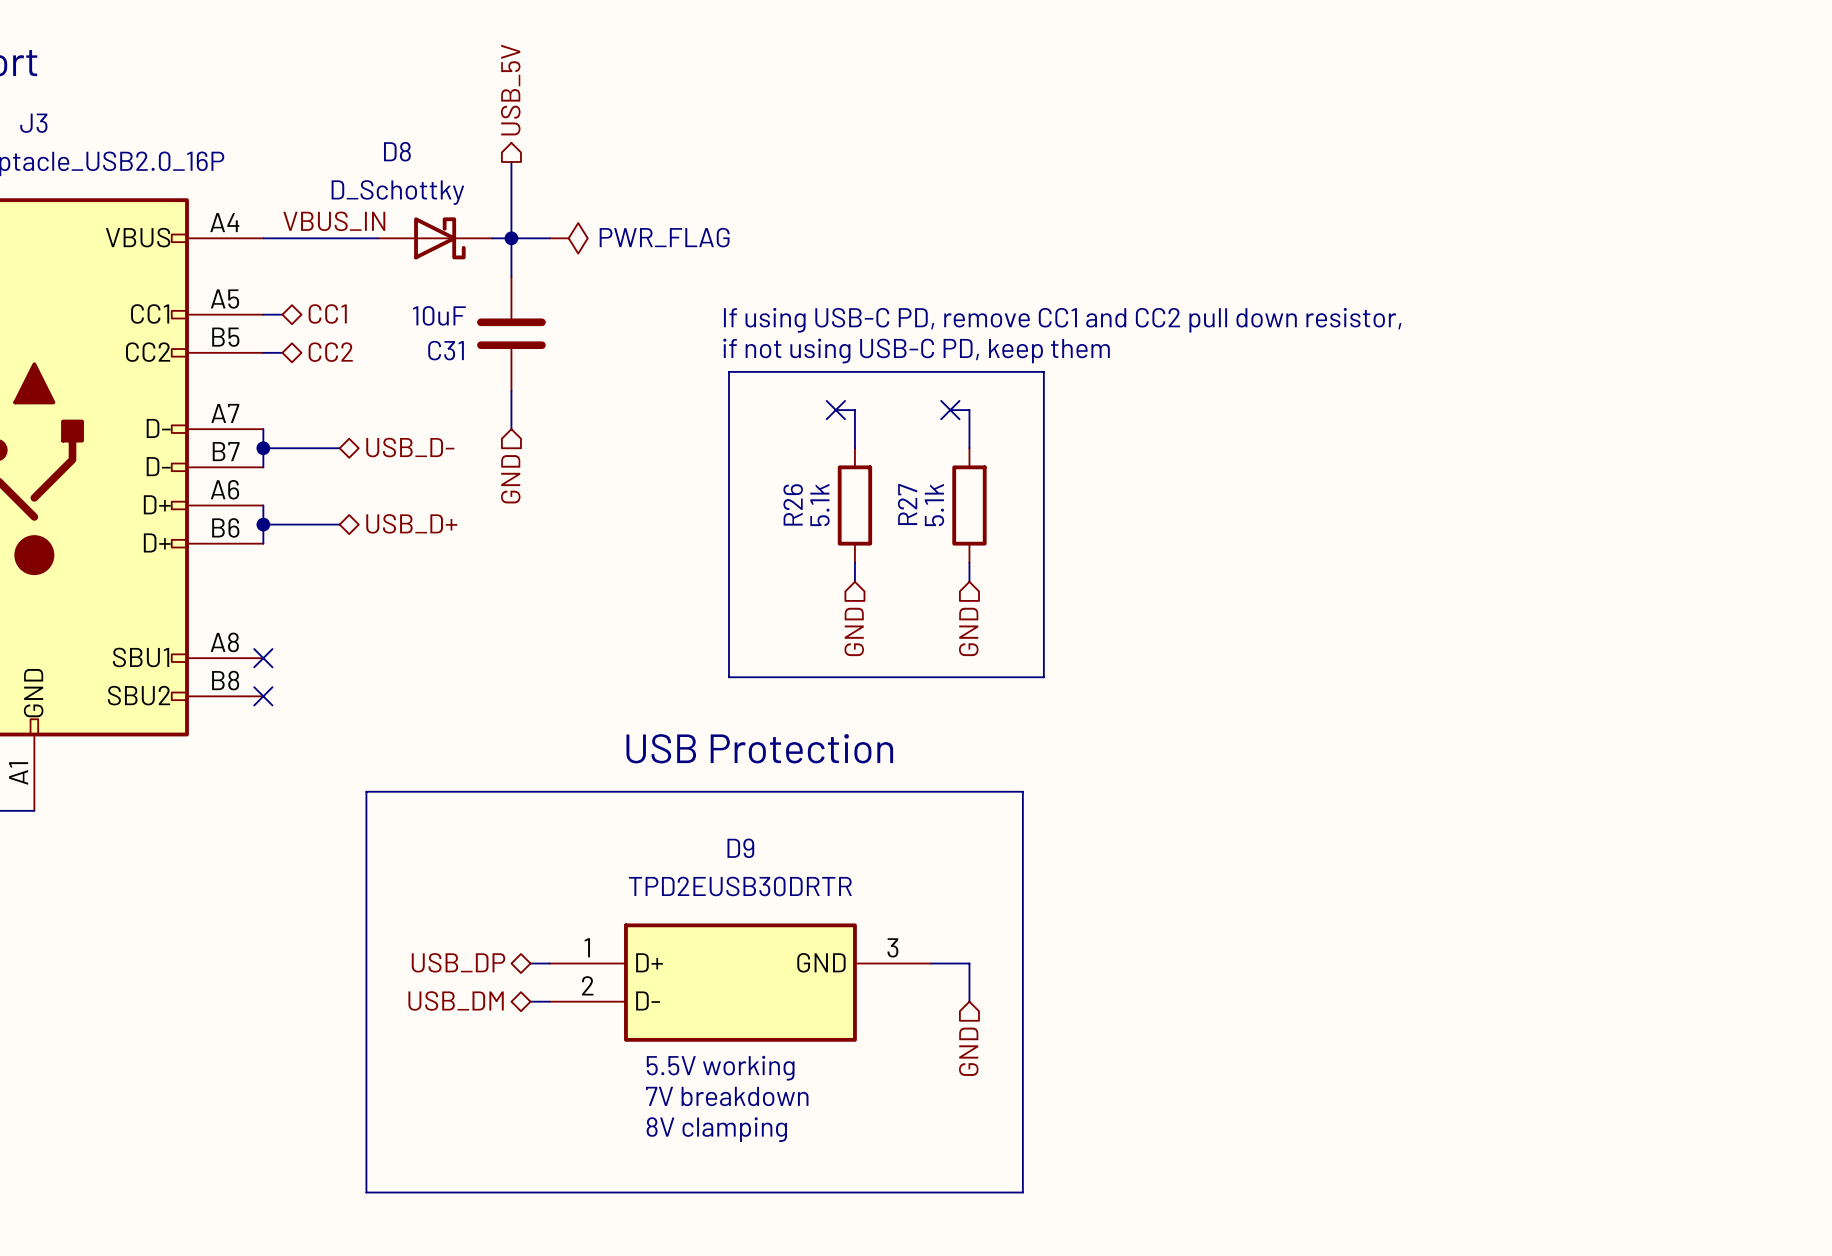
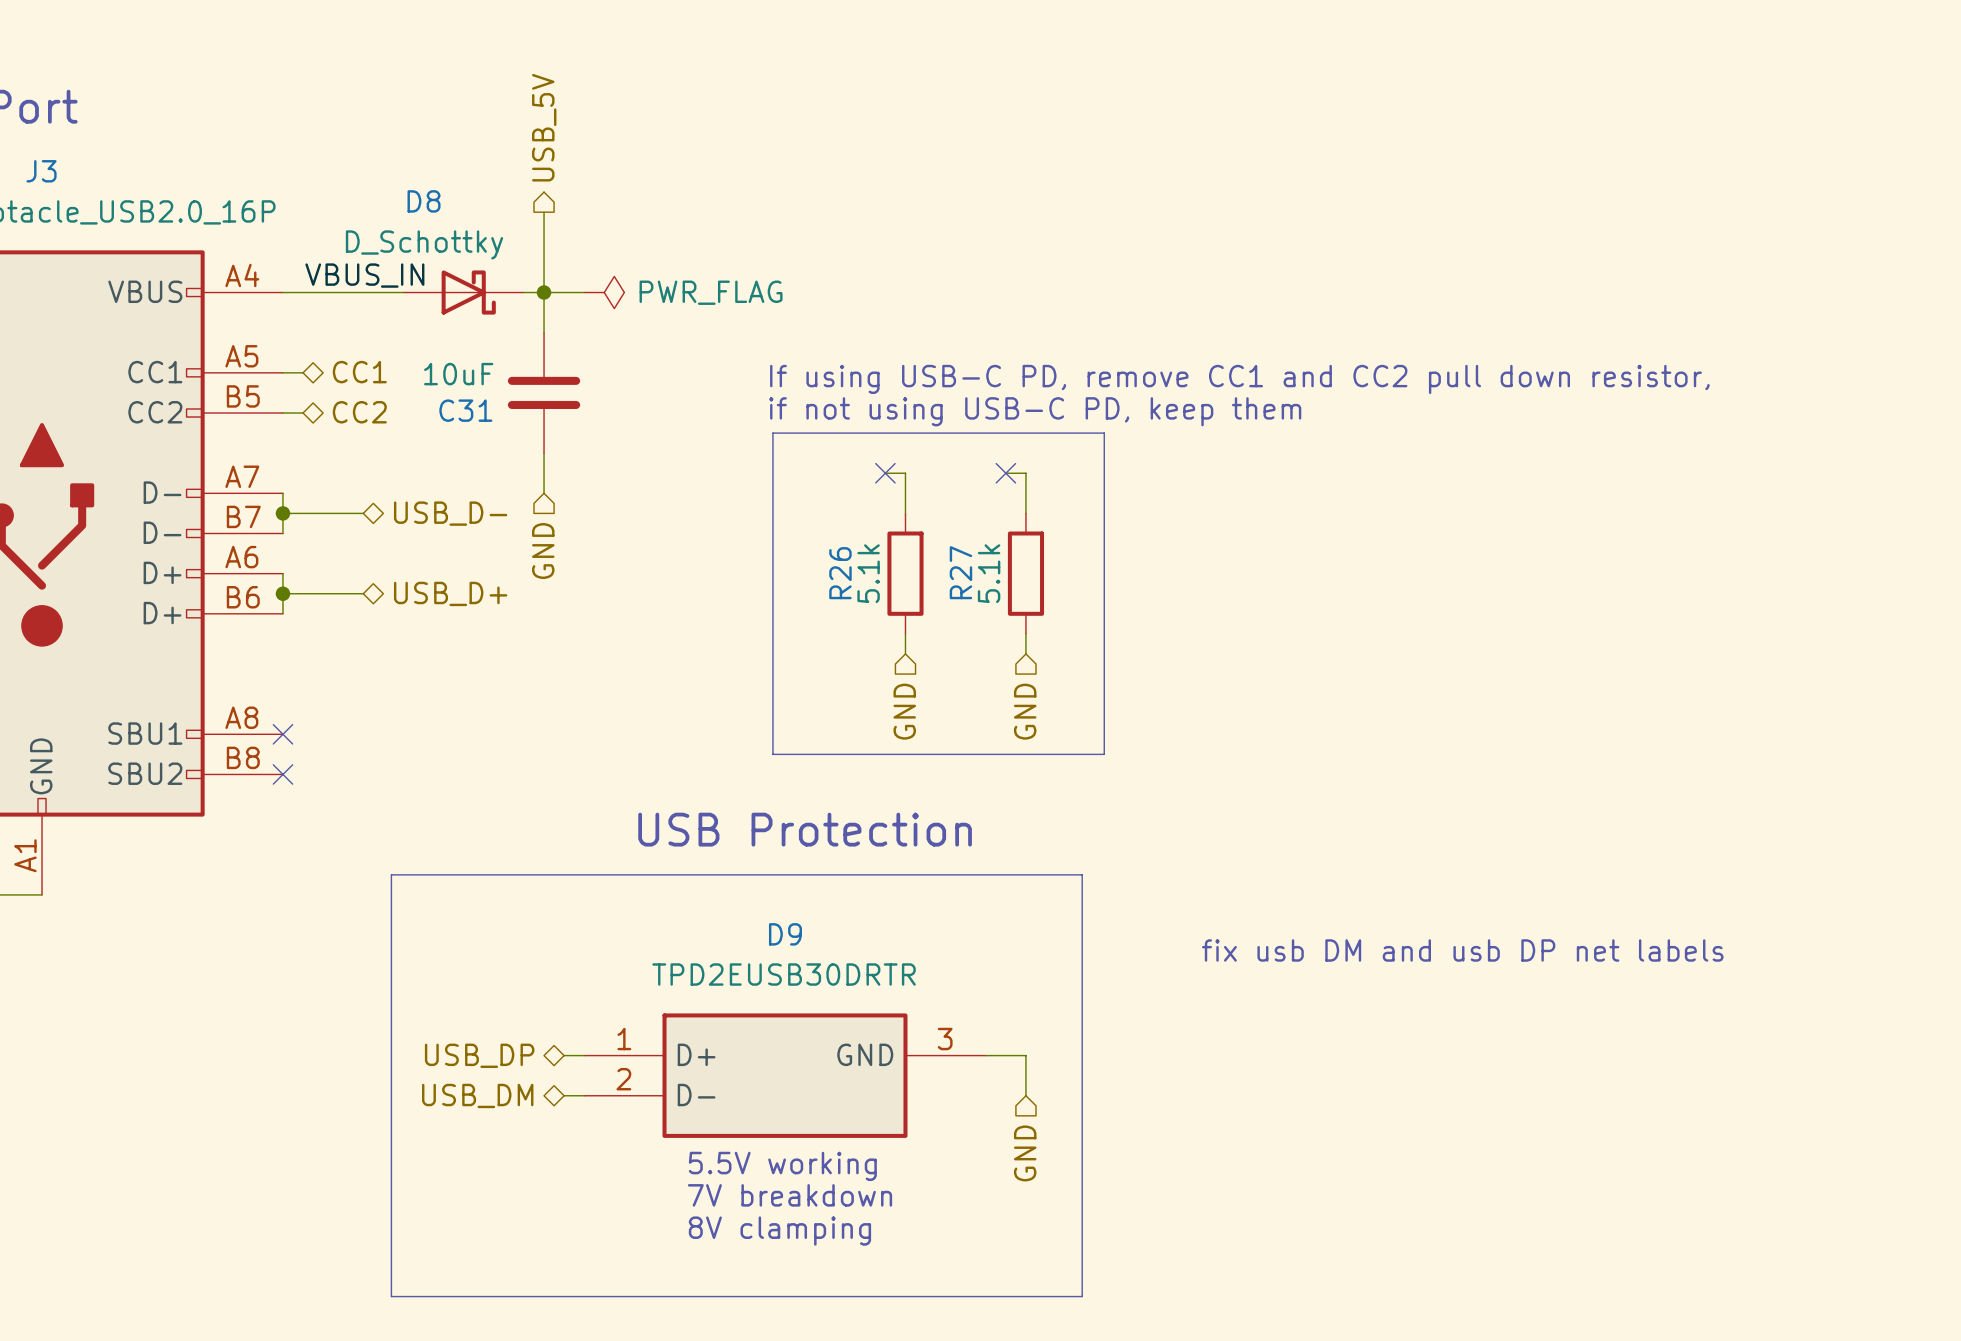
text: none -> fix usb DM and usb DP net labels (1462, 950)

